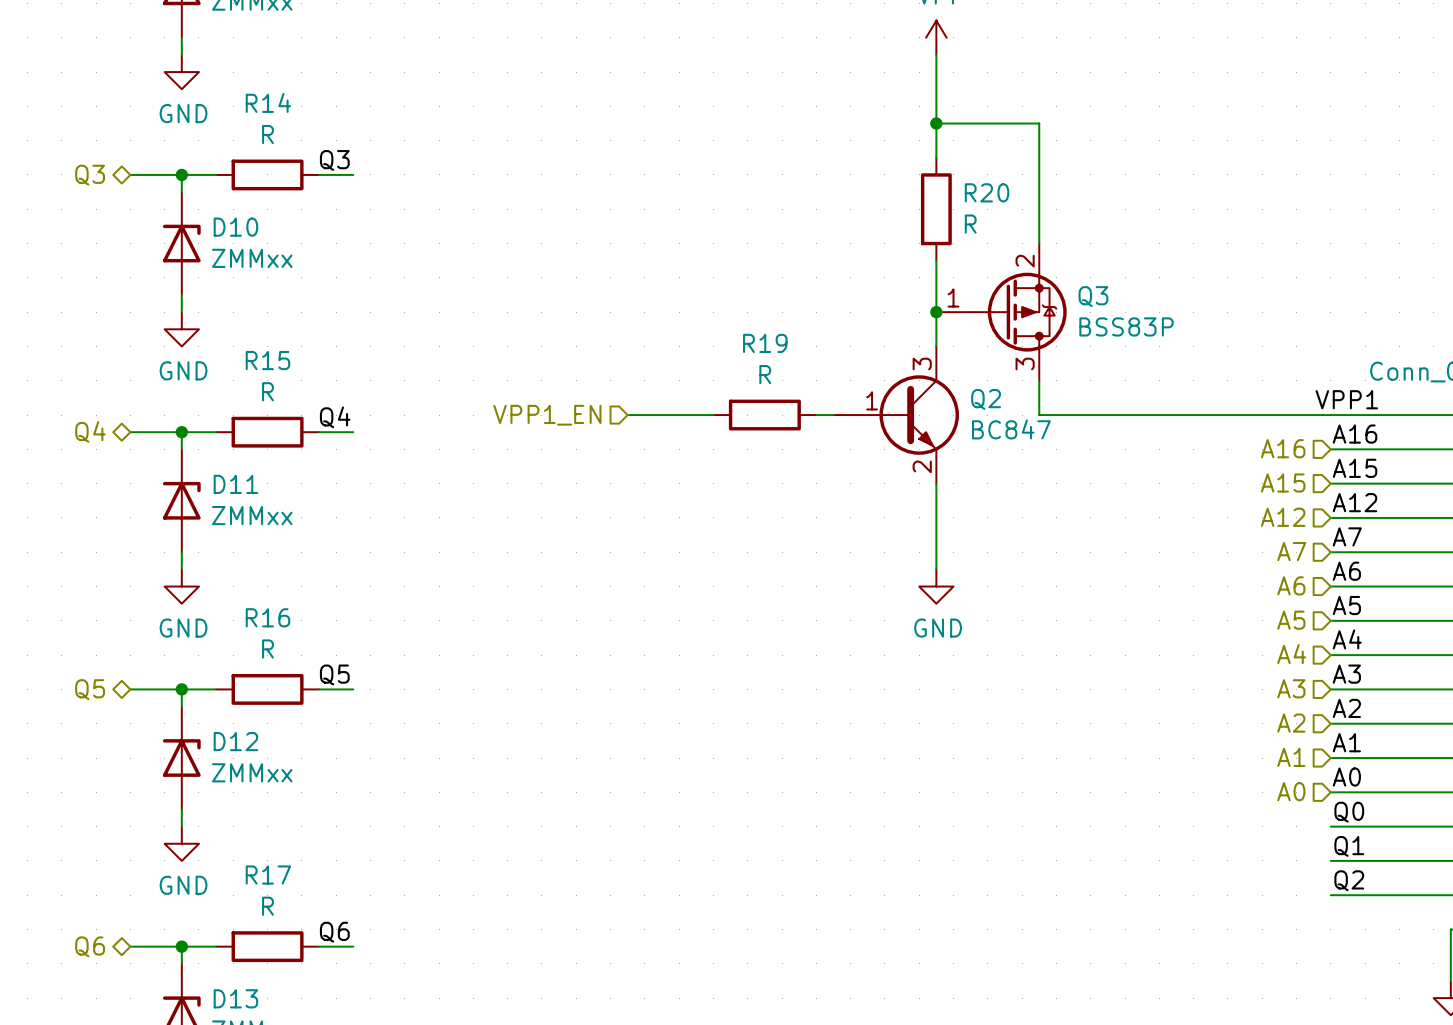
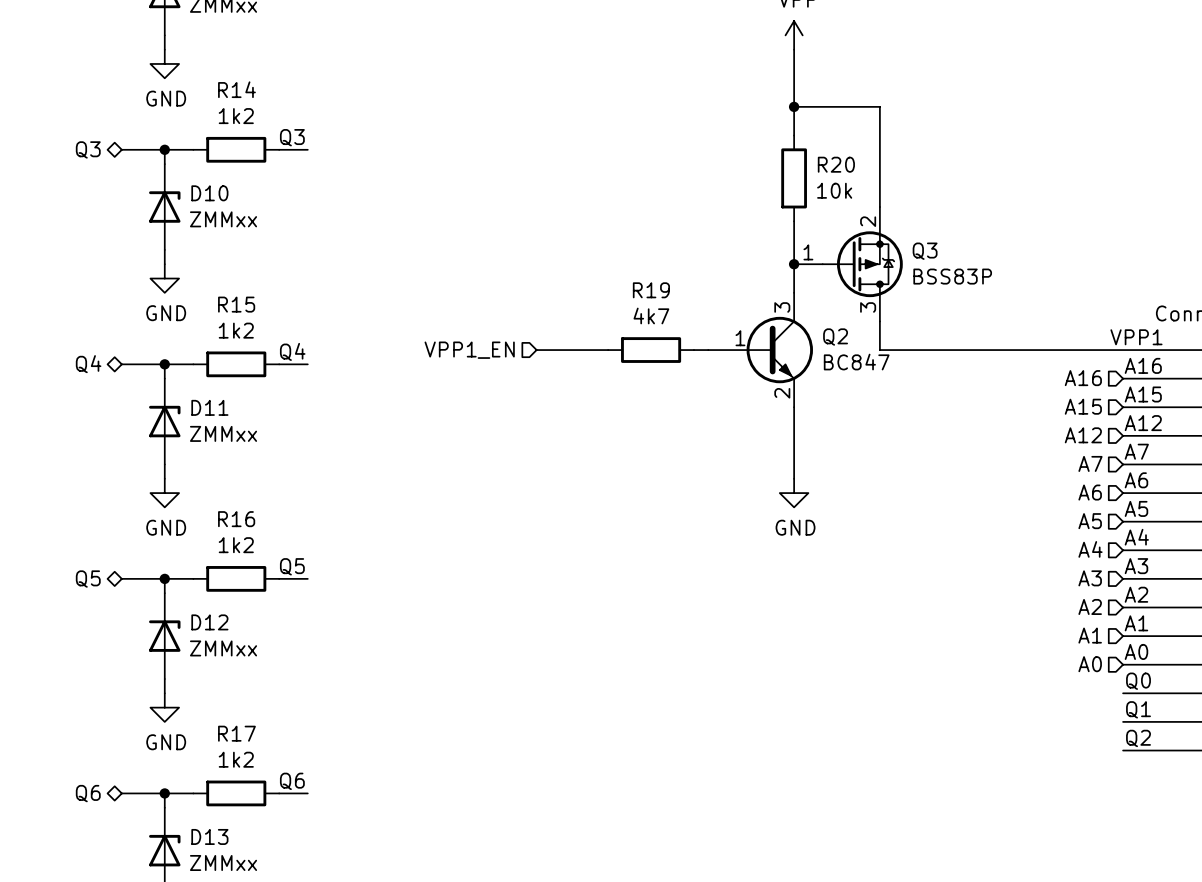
R14 value: R (267, 134) -> 1k2 (236, 116)
R20 value: R (970, 224) -> 10k (834, 190)
R19 value: R (765, 374) -> 4k7 (651, 315)
R15 value: R (267, 391) -> 1k2 (236, 330)
R16 value: R (267, 649) -> 1k2 (236, 545)
R17 value: R (267, 906) -> 1k2 (236, 759)

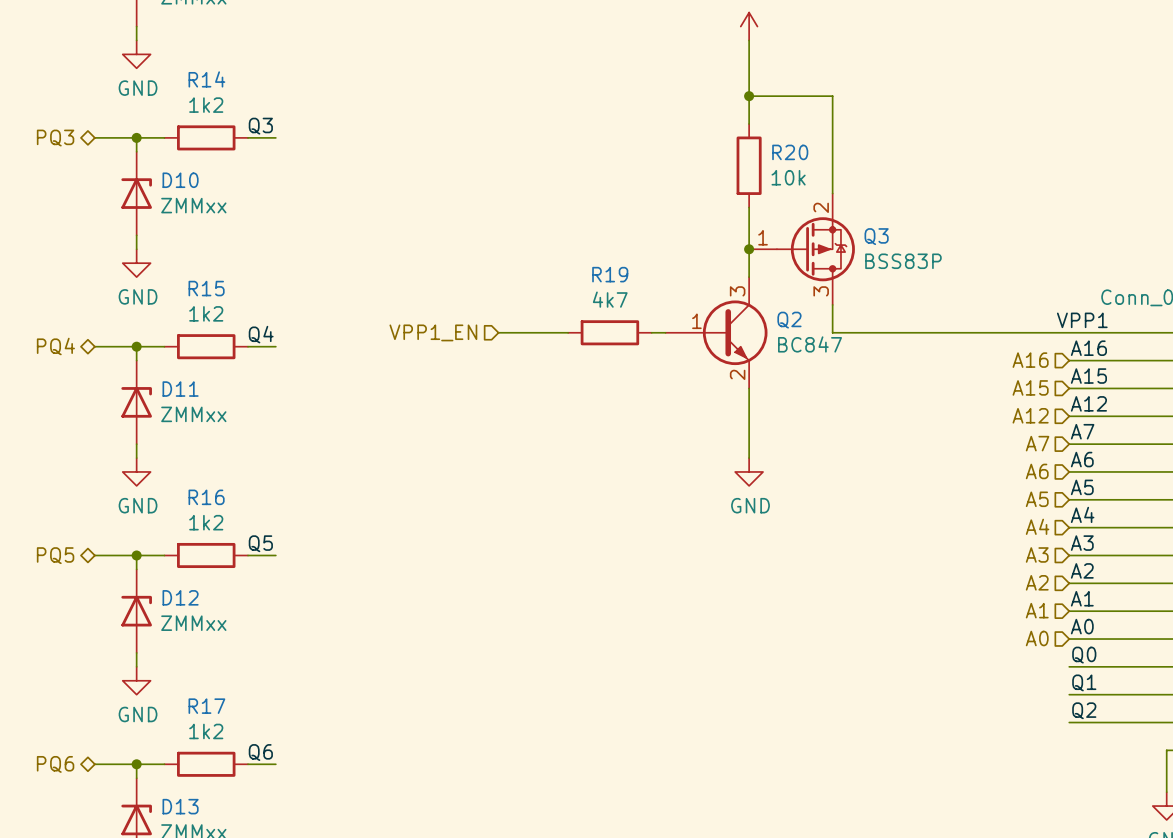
hierarchical label: Q3 (88, 149) -> PQ3 (55, 138)
hierarchical label: Q4 (88, 364) -> PQ4 (55, 346)
hierarchical label: Q5 (88, 579) -> PQ5 (55, 555)
hierarchical label: Q6 (88, 793) -> PQ6 (55, 764)

